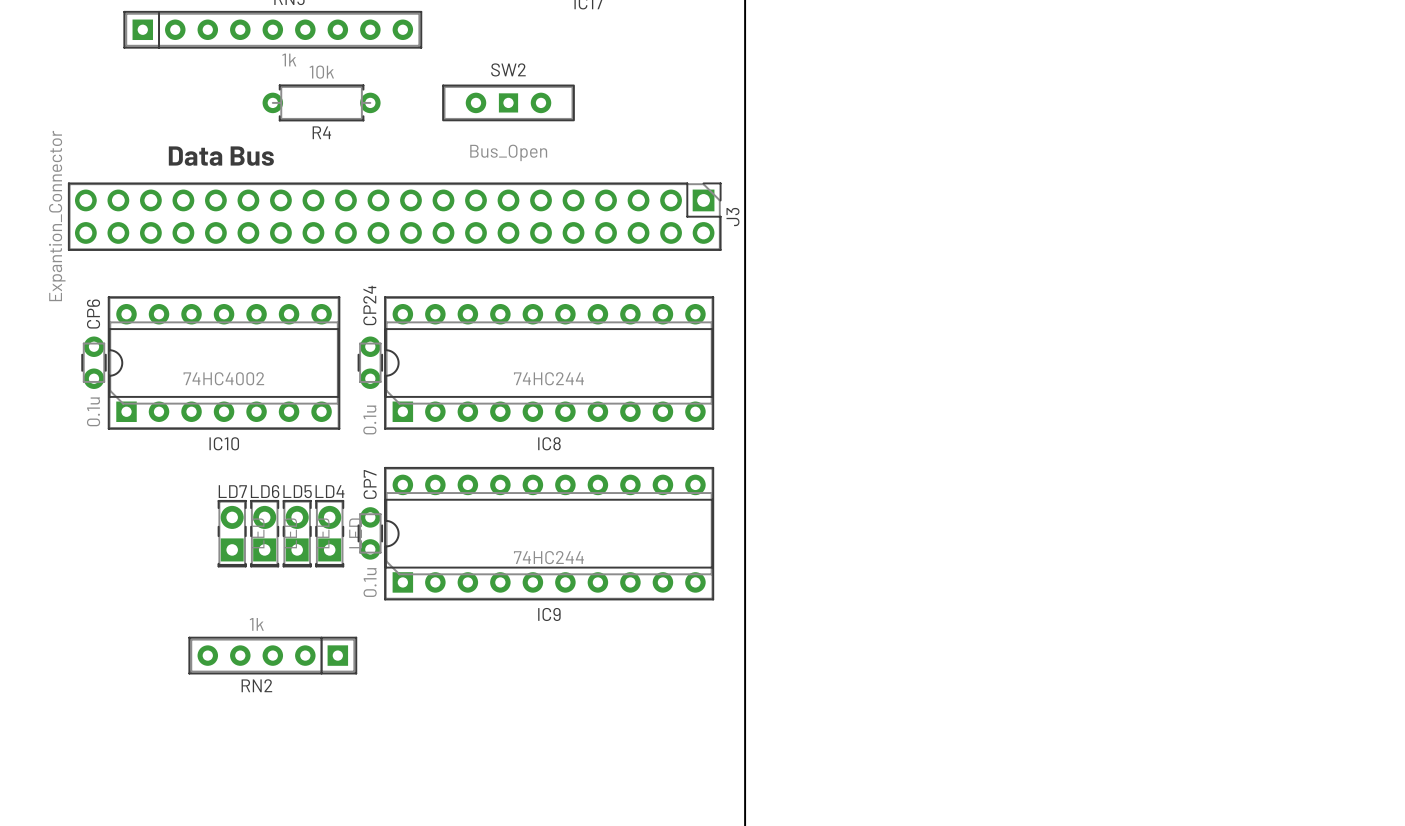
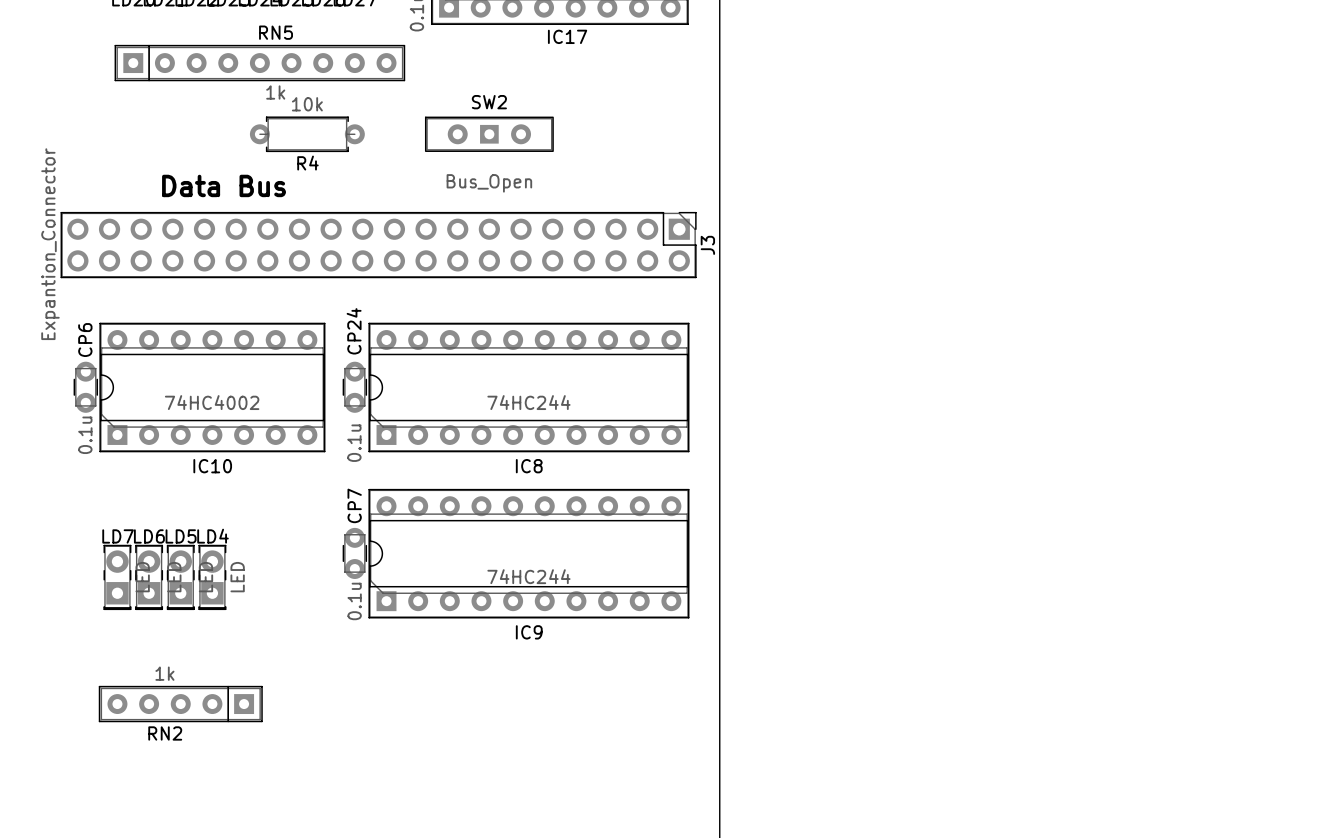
LD7 position: (232, 533) -> (117, 577)
LD6 position: (264, 533) -> (149, 577)
LD5 position: (297, 533) -> (180, 577)
LD4 position: (329, 533) -> (212, 577)
RN2 position: (272, 655) -> (180, 704)

